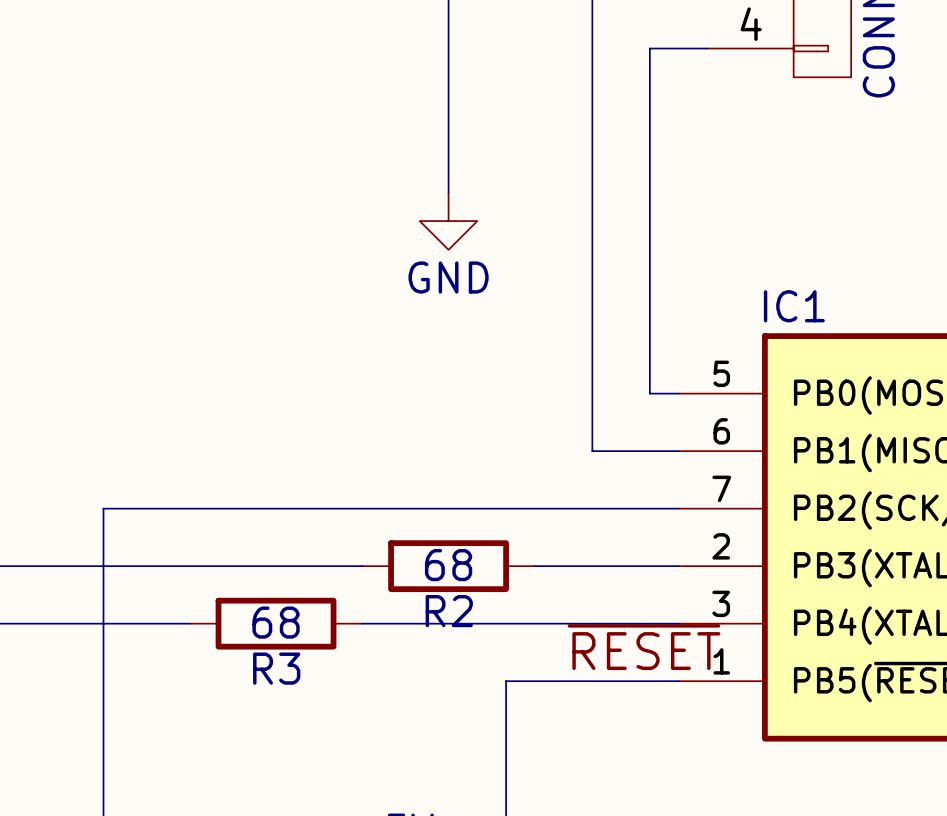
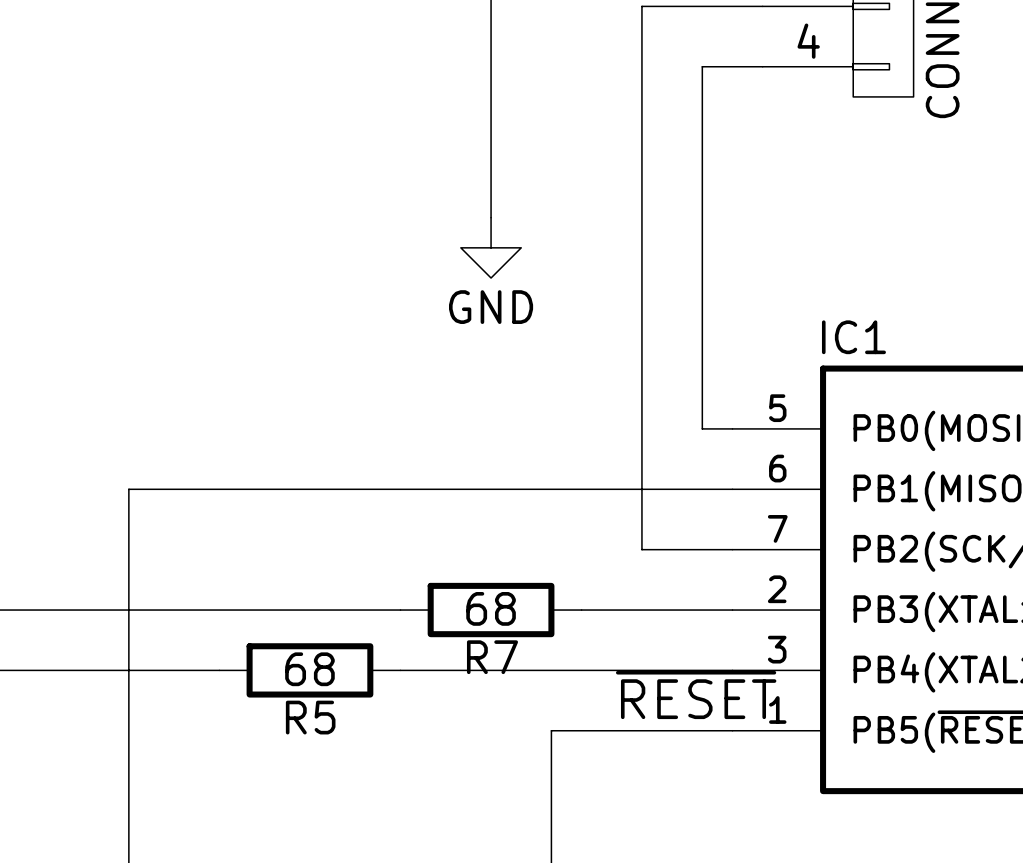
wire: (103, 508) (592, 508) -> (128, 549) (128, 489) (641, 489) (641, 549)
R2 name: R2 (449, 611) -> R7 (492, 657)
R3 name: R3 (276, 668) -> R5 (310, 717)

